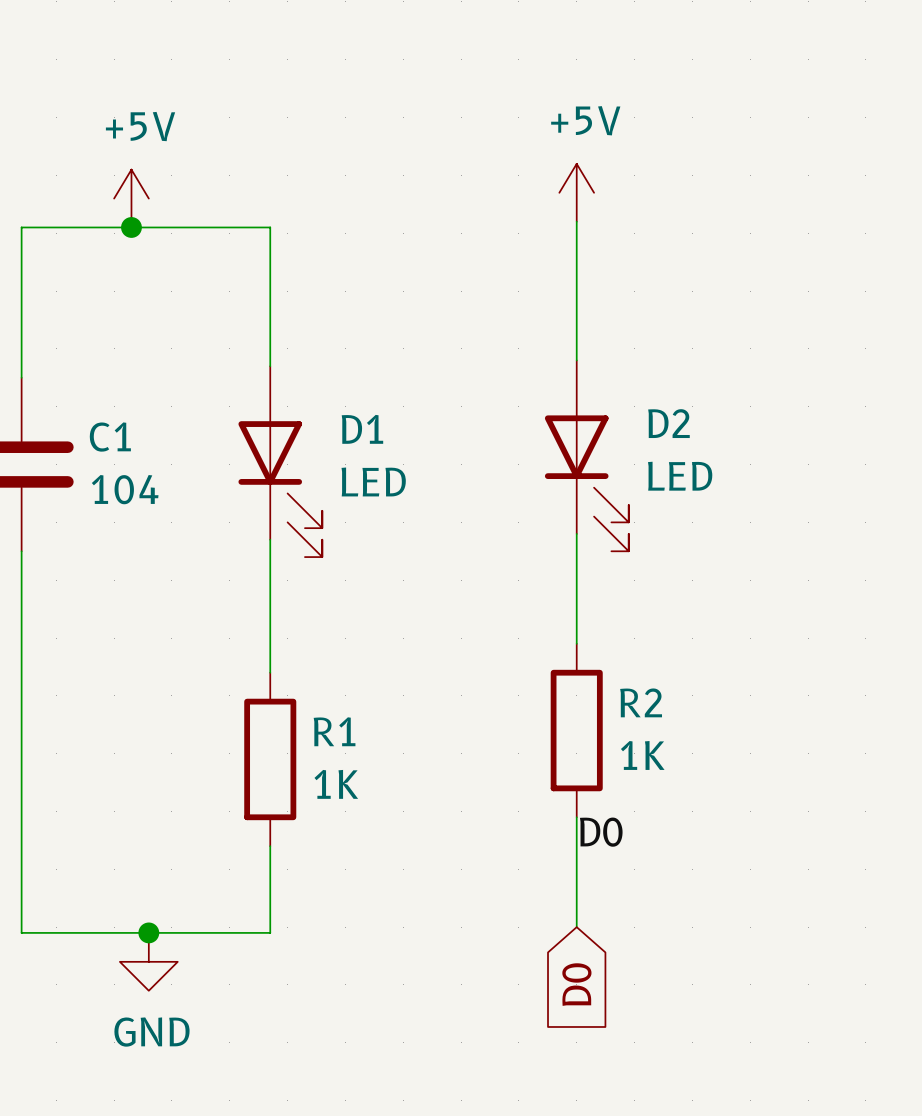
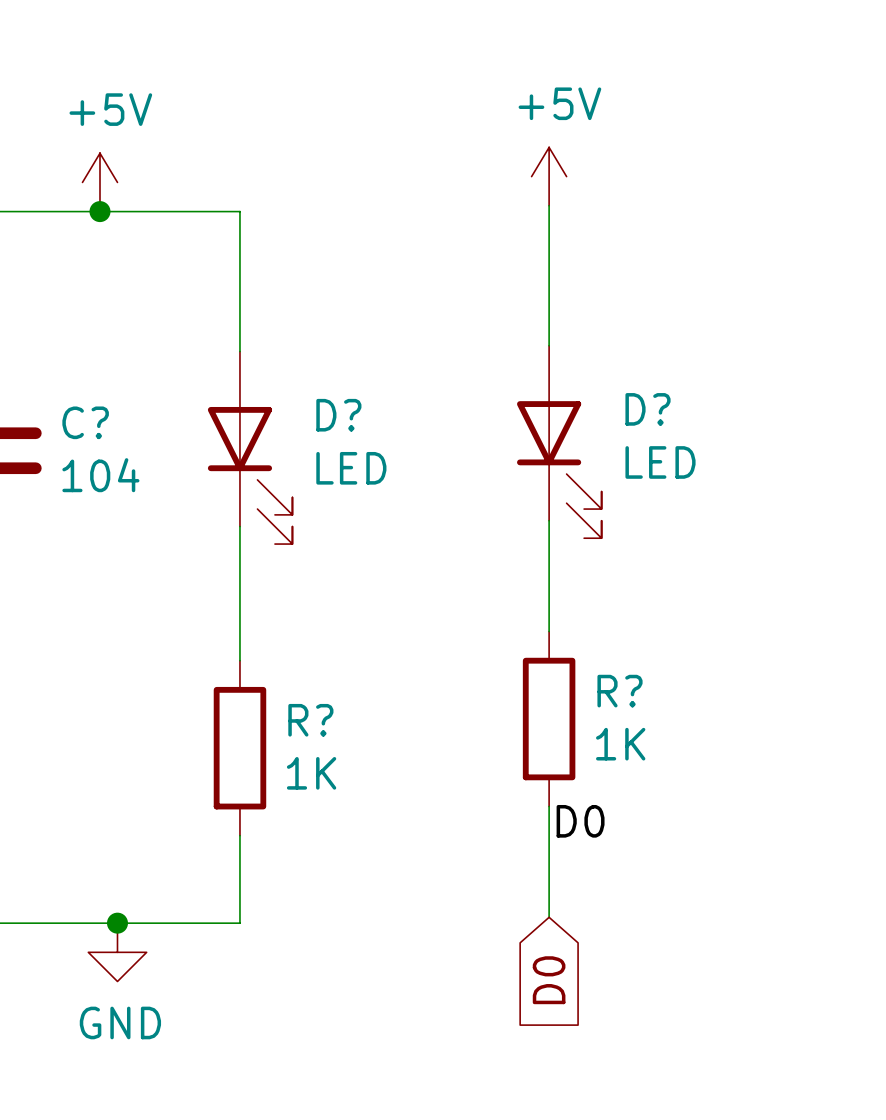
D2 name: D2 (668, 423) -> D? (648, 409)
D1 name: D1 (362, 429) -> D? (338, 415)
C1 name: C1 (110, 437) -> C? (85, 422)
R2 name: R2 (641, 702) -> R? (620, 691)
R1 name: R1 (334, 731) -> R? (310, 720)

